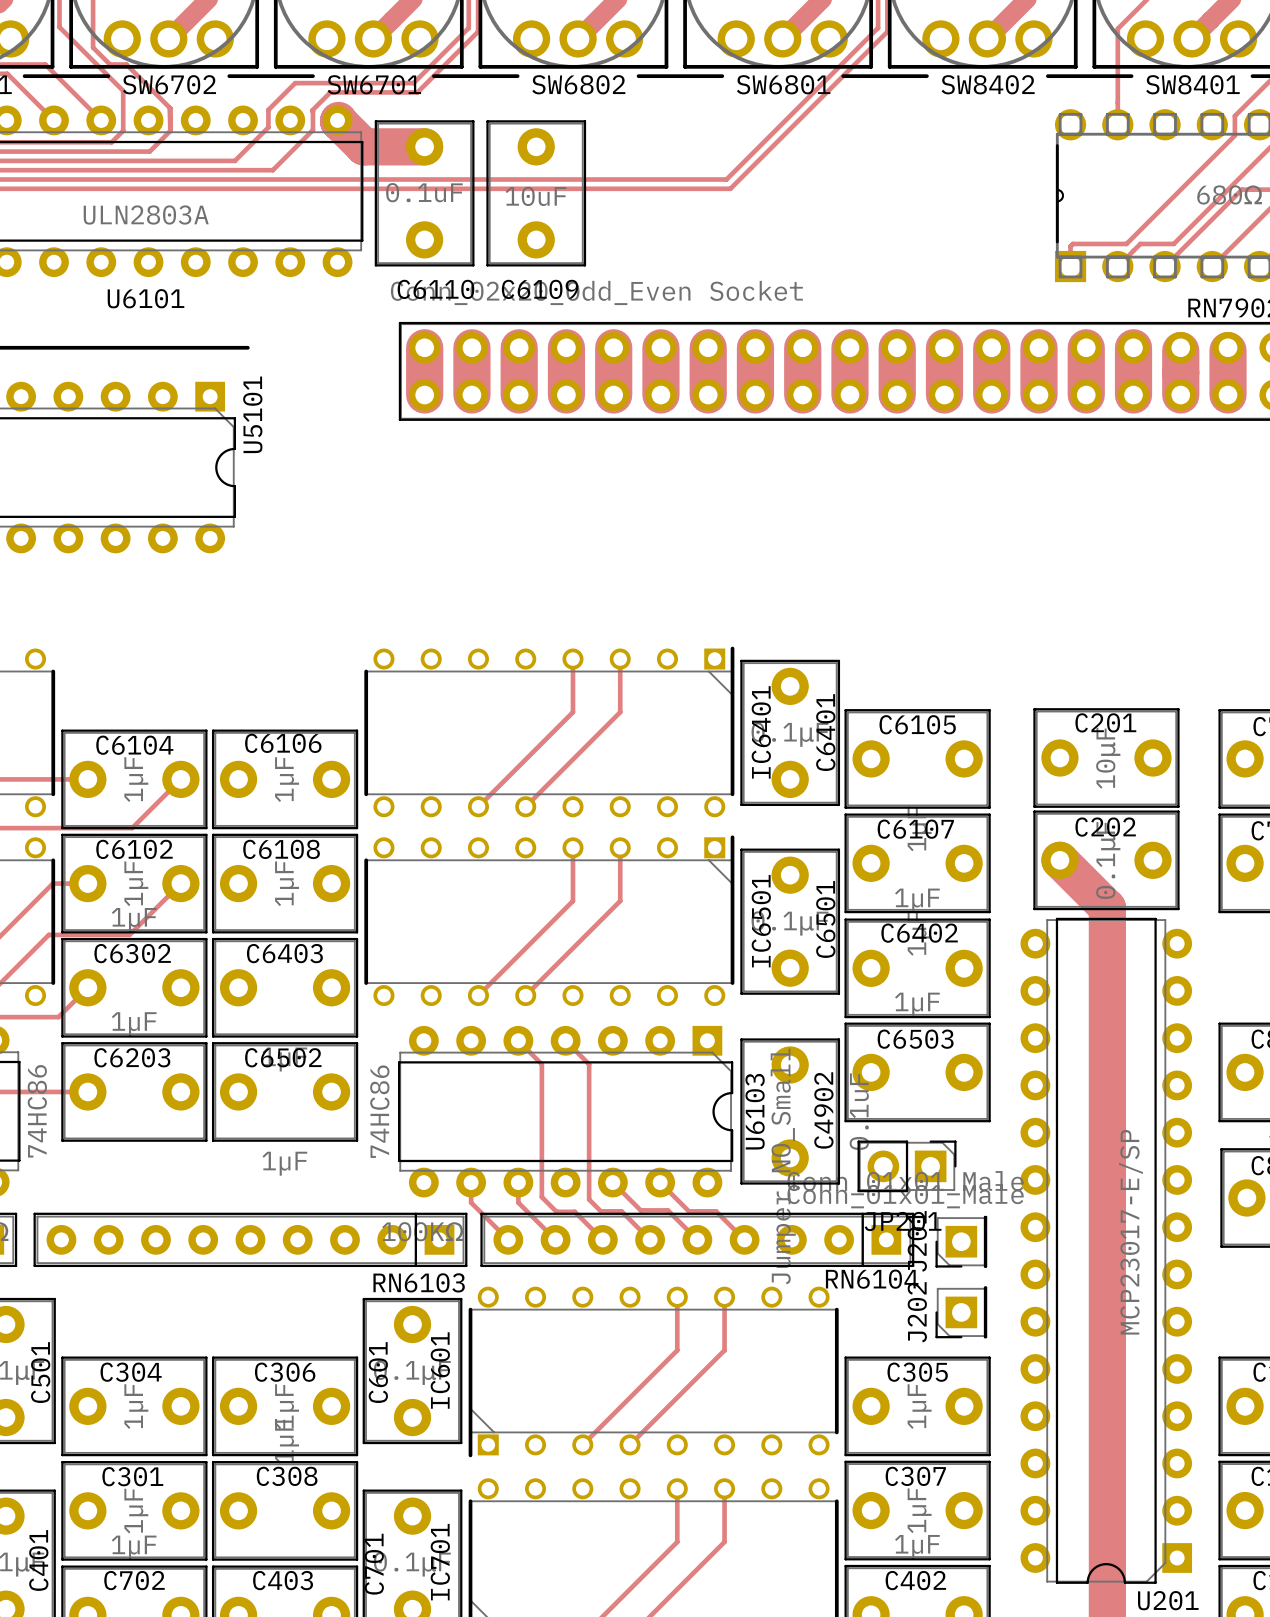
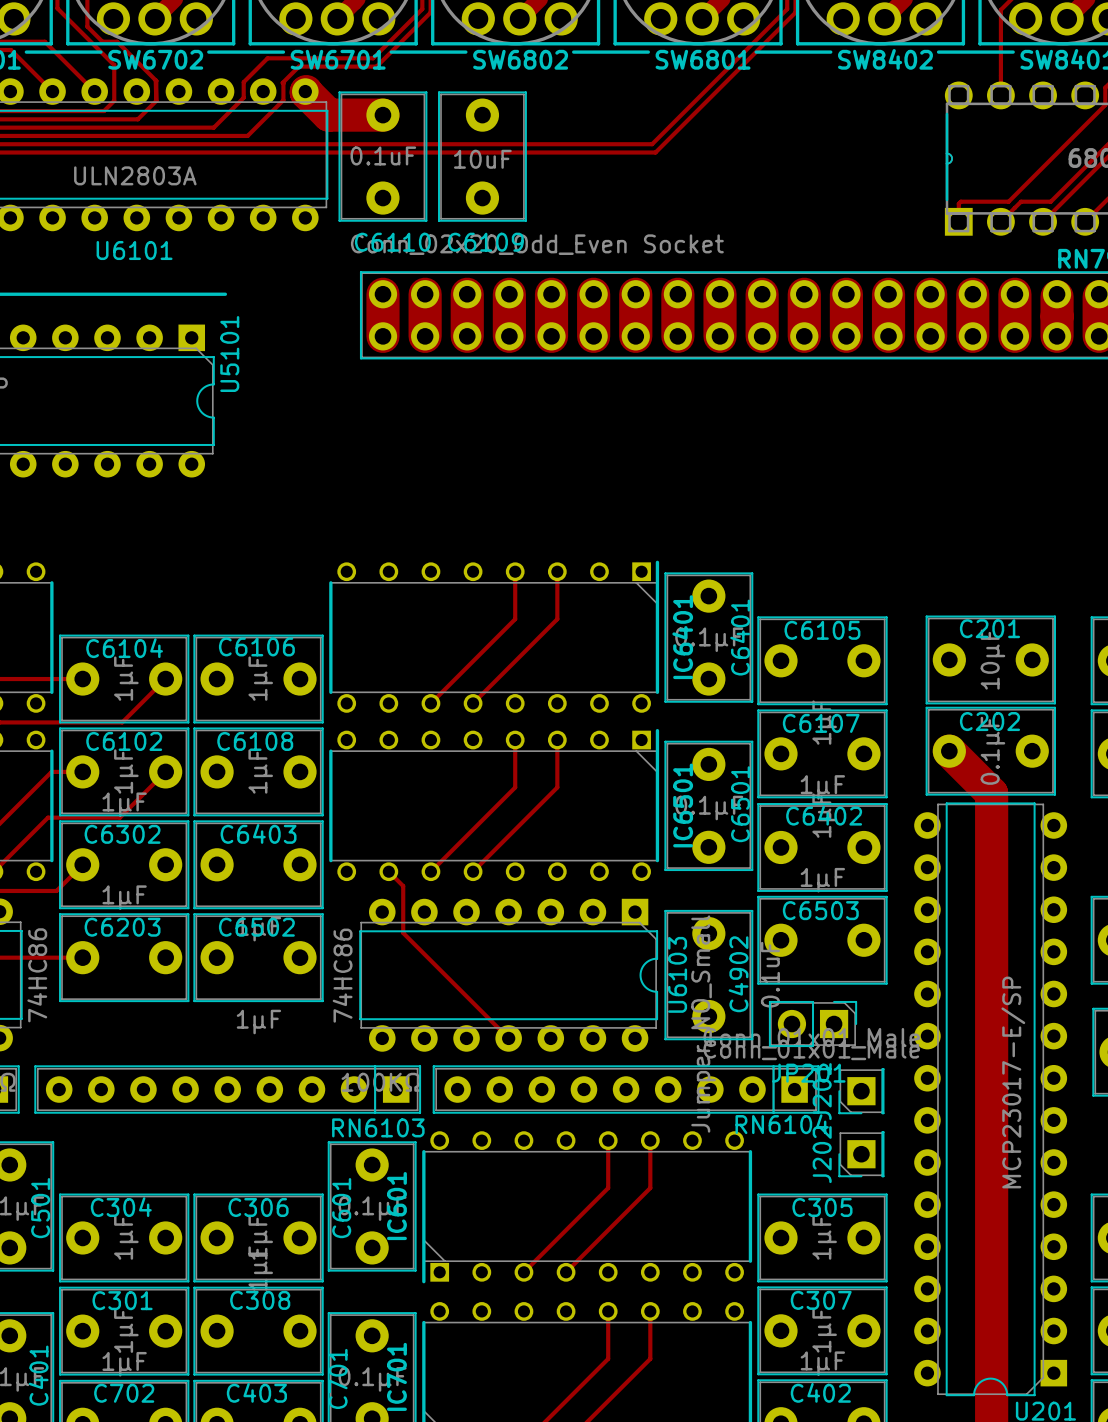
track: none -> (388, 871) (403, 886) (403, 933) (508, 1038)
track: (518, 1040) (541, 1064) (541, 1197) (556, 1211) (574, 1211) (602, 1239) -> none
track: (565, 1040) (589, 1064) (589, 1199) (600, 1211) (621, 1211) (650, 1239) -> none
track: (471, 1182) (471, 1202) (508, 1239) -> none
track: (518, 1182) (518, 1202) (555, 1239) -> none
track: (612, 1182) (640, 1210) (667, 1210) (697, 1239) -> none
track: (660, 1182) (688, 1211) (716, 1211) (744, 1239) -> none

